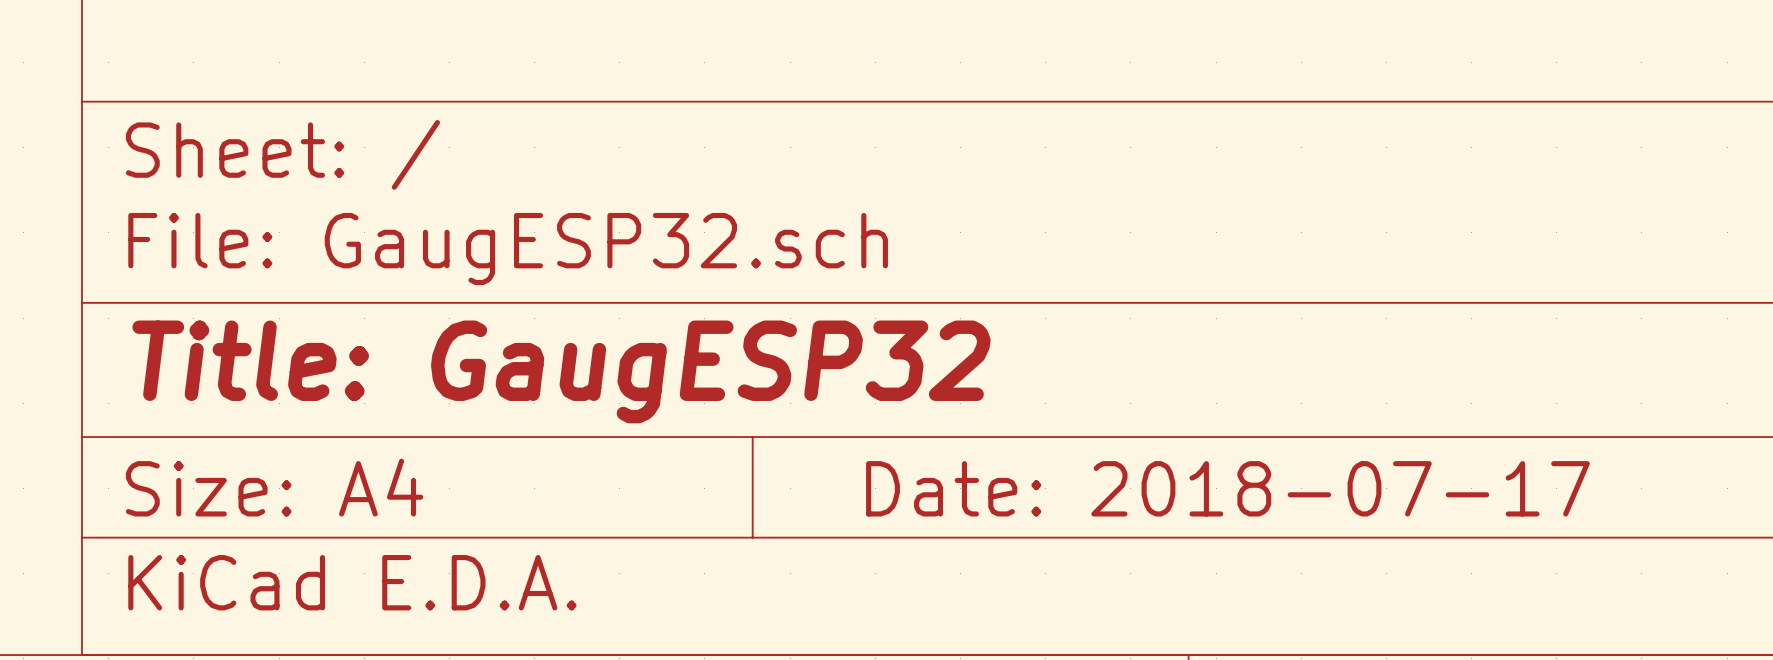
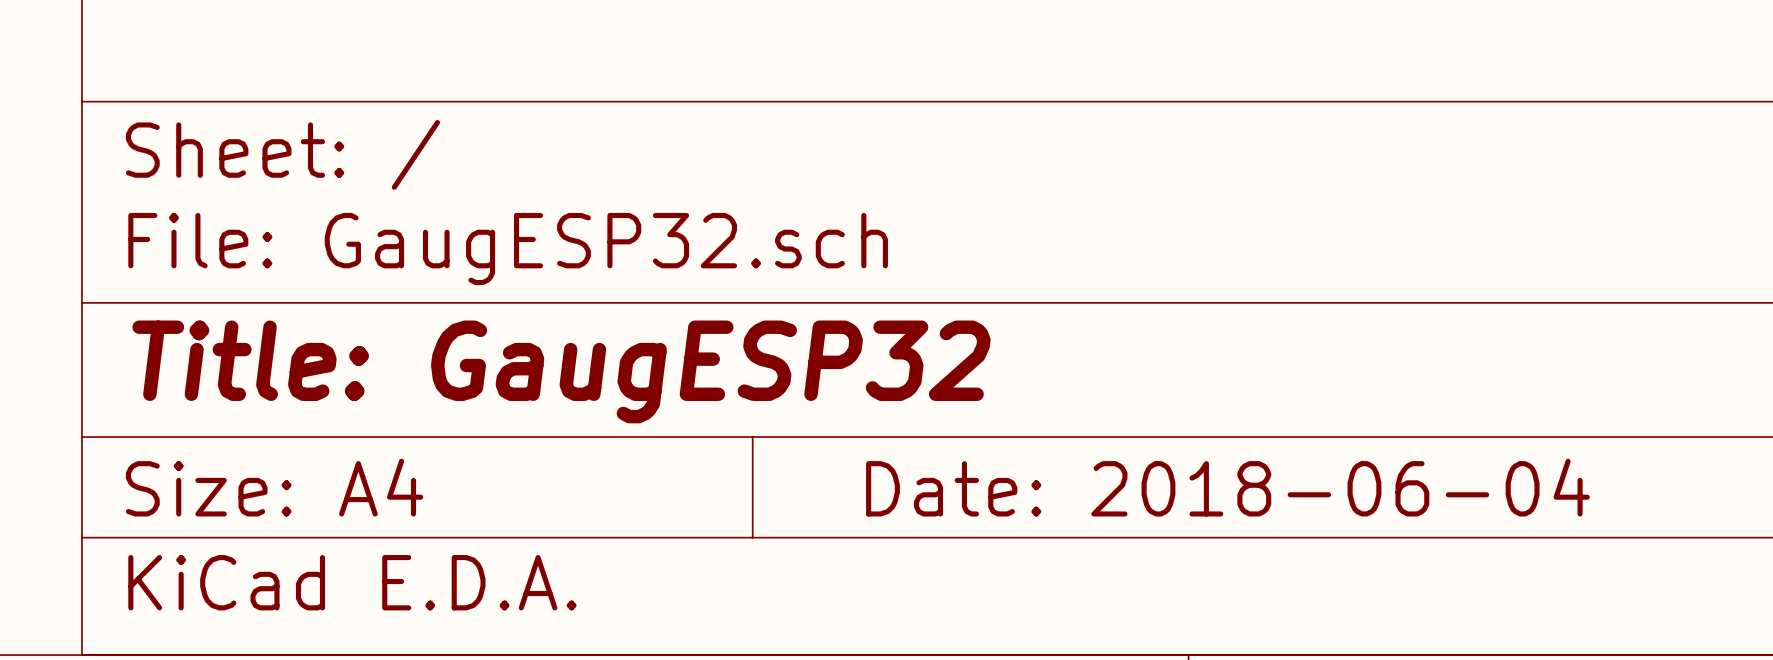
title block: Date: 2018-07-17 (1227, 488) -> Date: 2018-06-04 (1227, 487)

